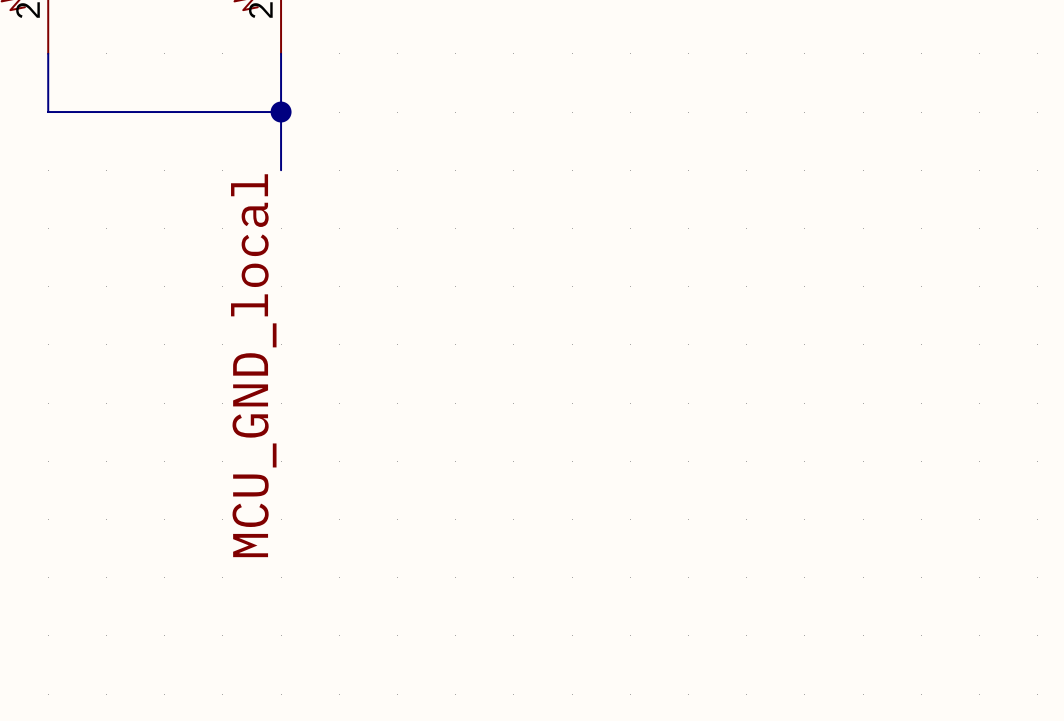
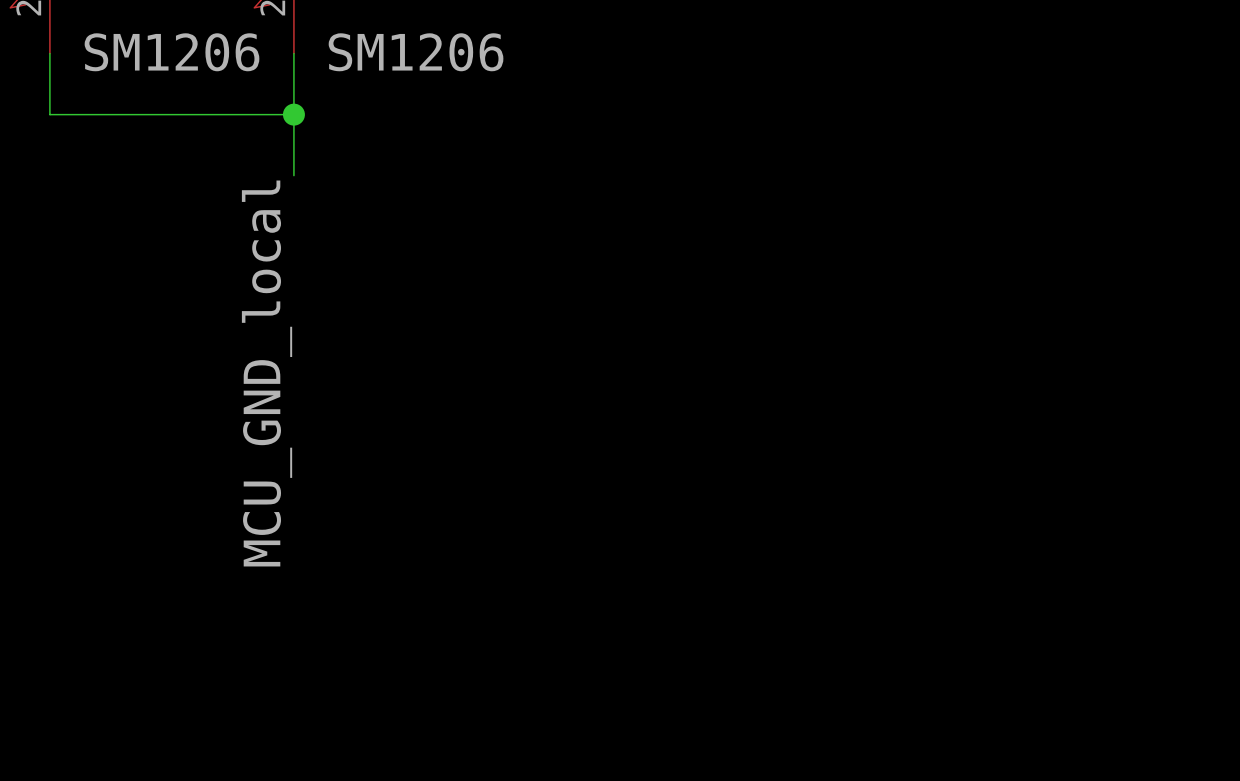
part text: none -> SM1206 (172, 52)
part text: none -> SM1206 (416, 52)

